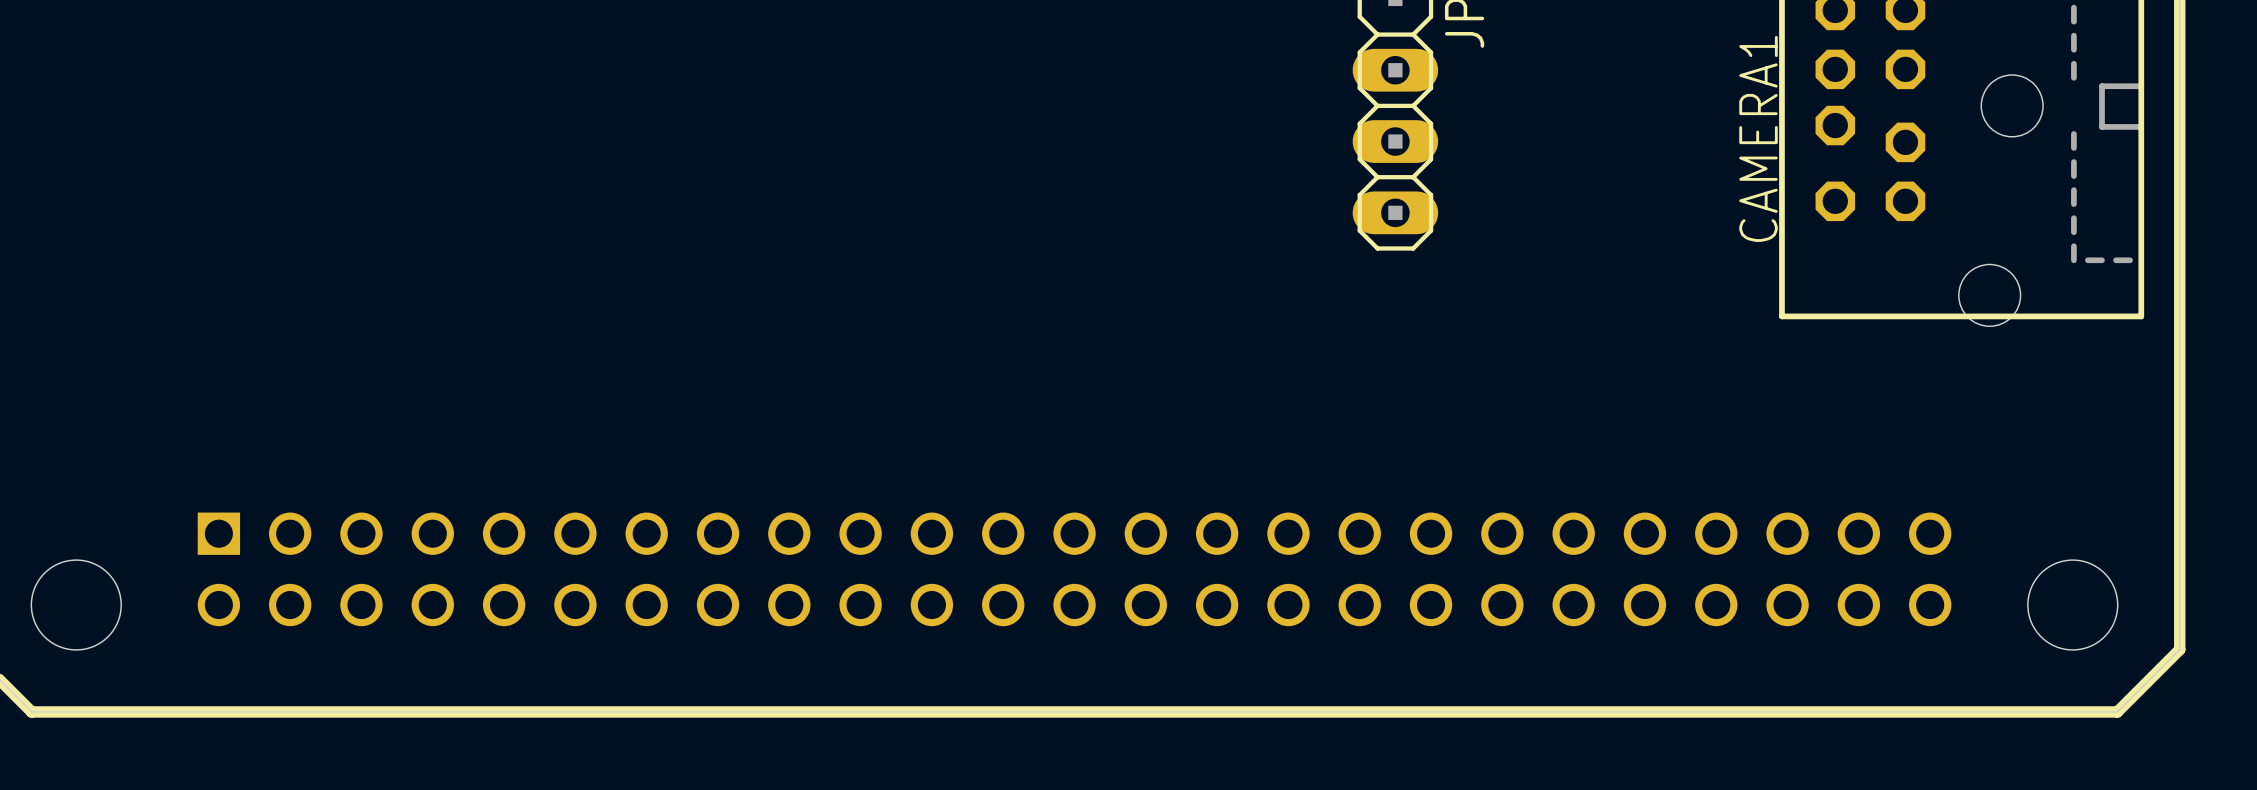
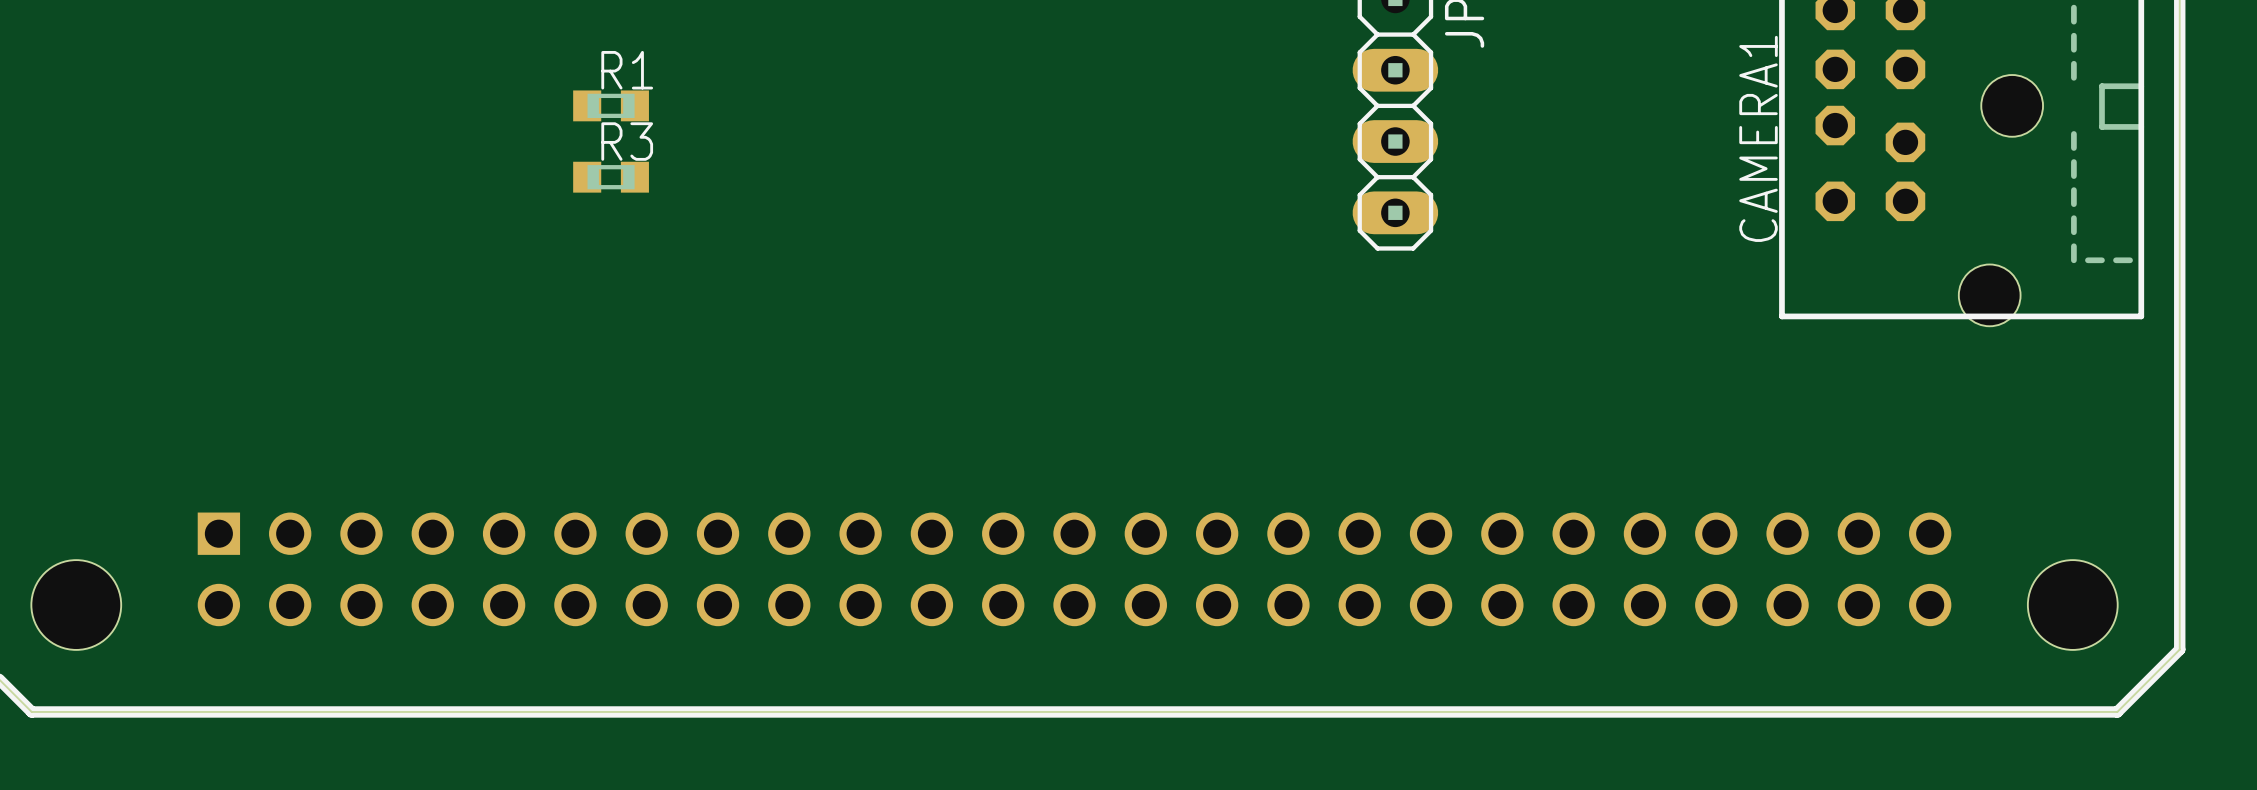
R1: none -> (611, 105)
R3: none -> (611, 177)

